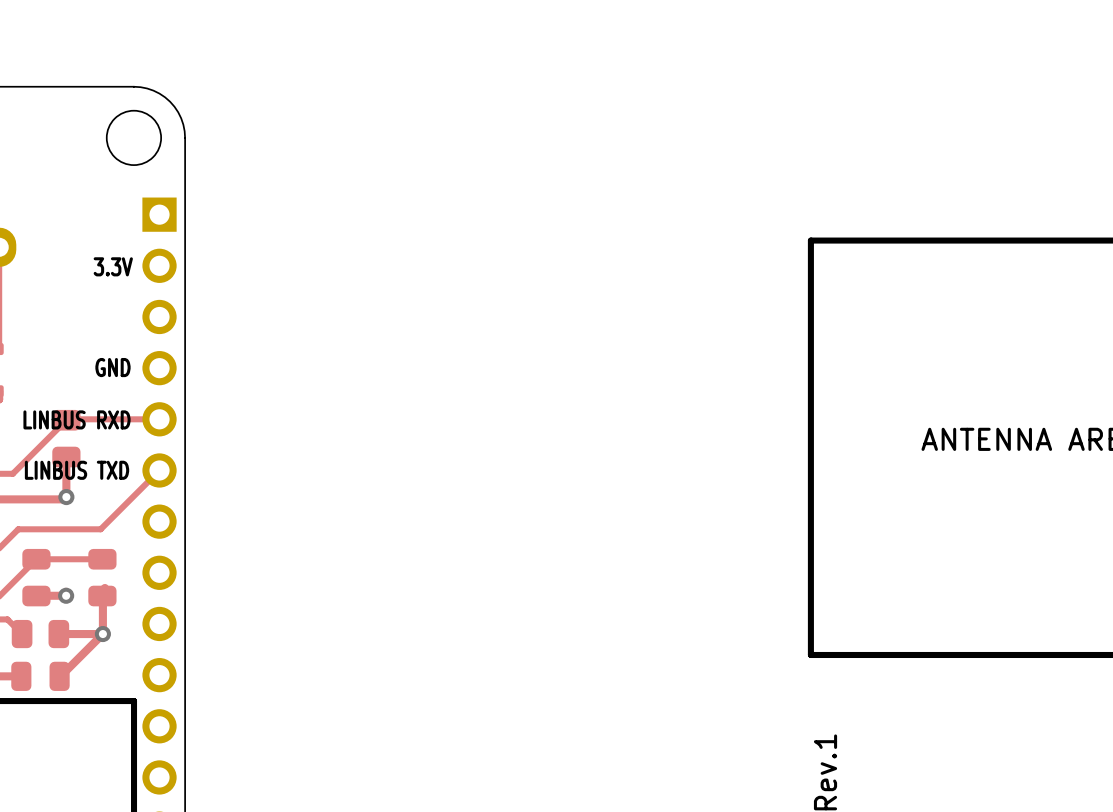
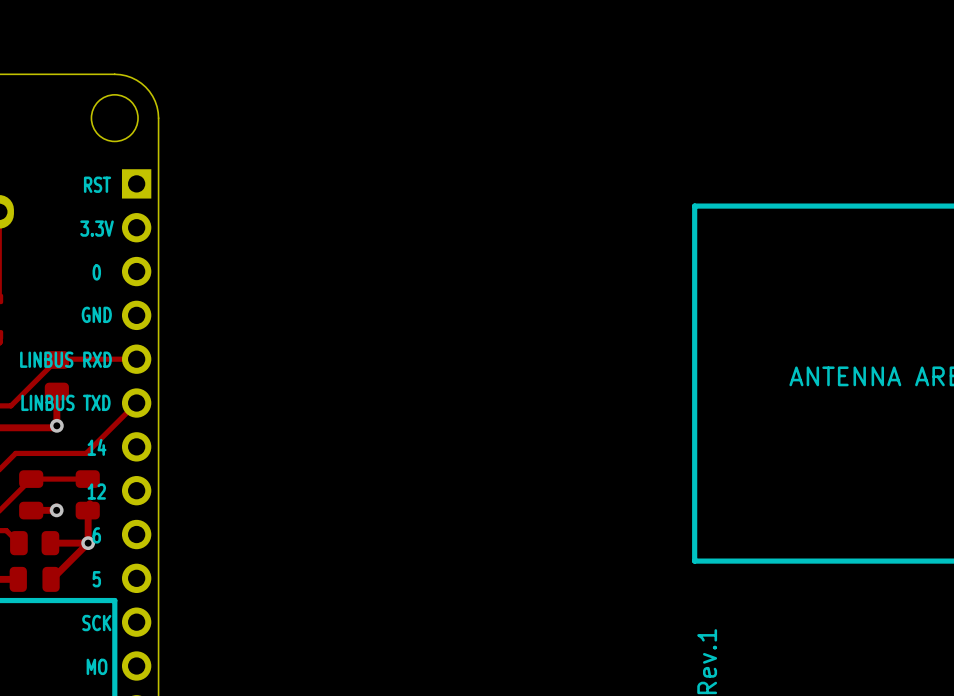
text: none -> RST (97, 184)
text: none -> 0 (96, 272)
text: none -> 14 (97, 447)
text: none -> 12 (96, 491)
text: none -> 6 (96, 535)
text: none -> 5 (96, 579)
text: none -> SCK (96, 623)
text: none -> MO (97, 666)

